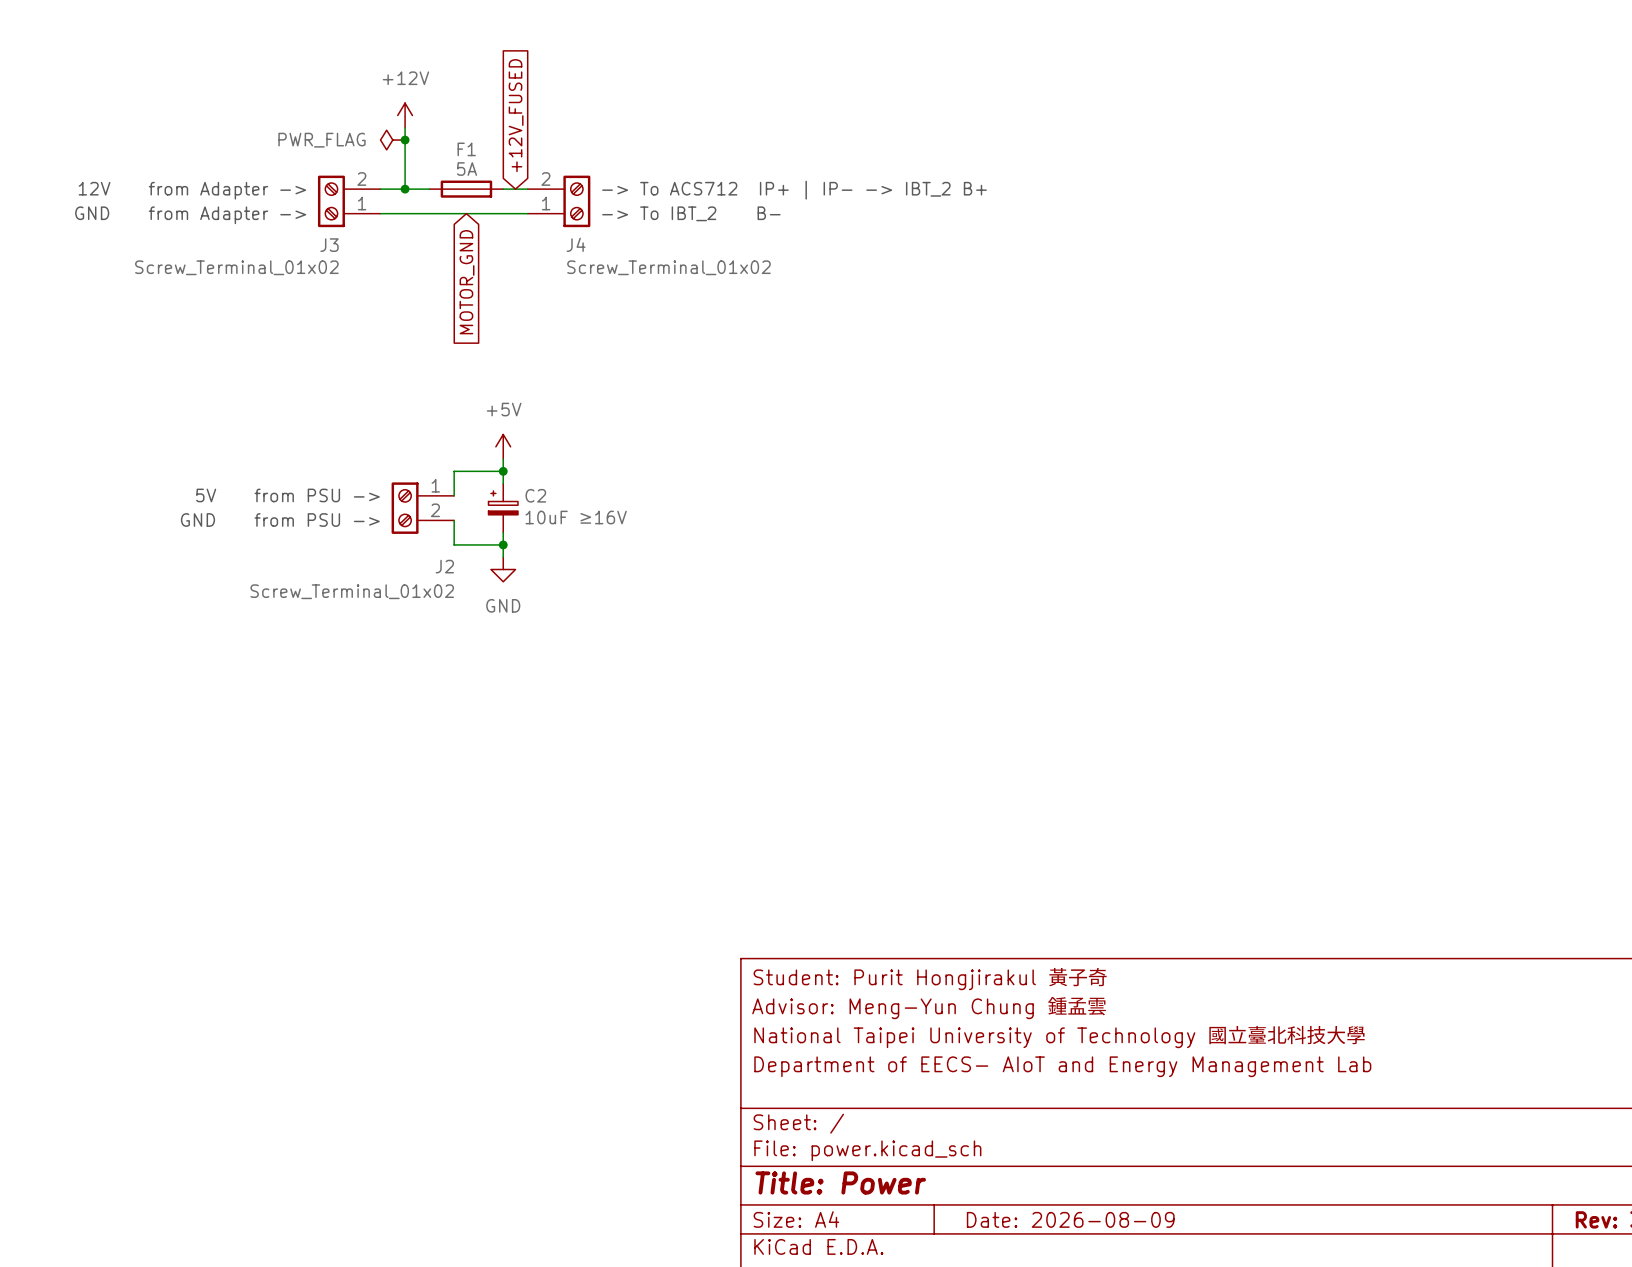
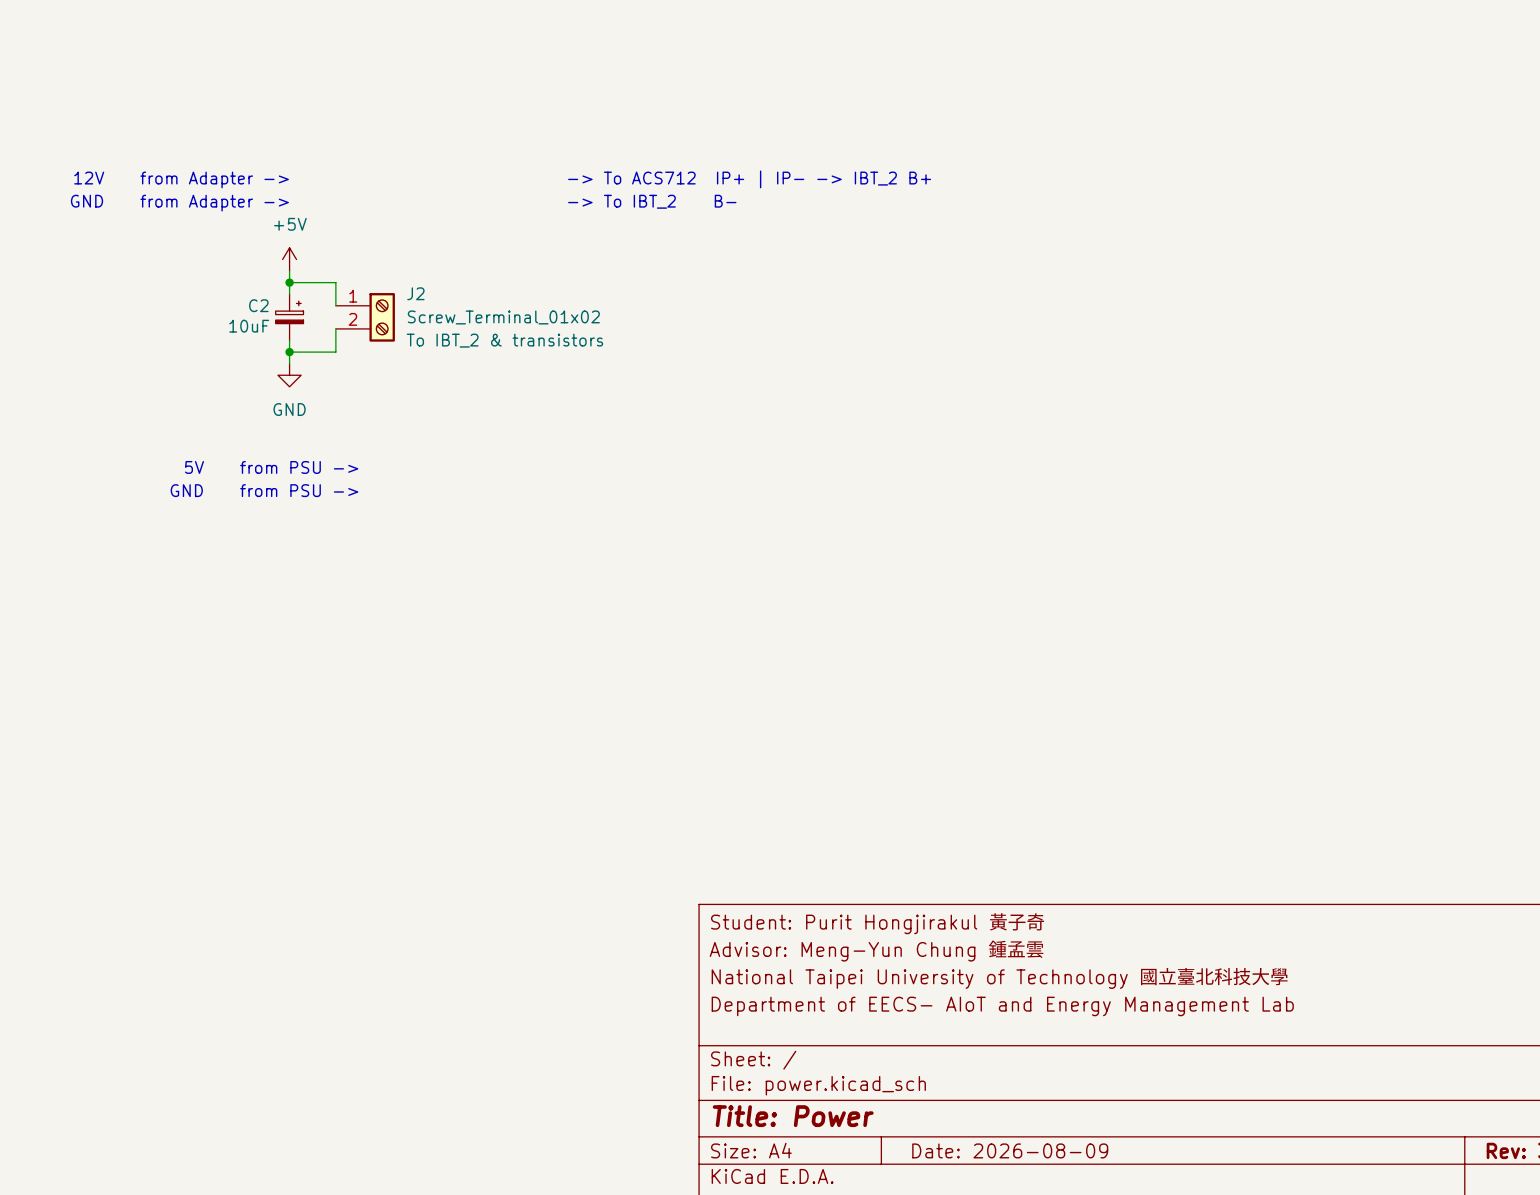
power symbol: +12V (405, 115) -> none
global label: +12V_FUSED (516, 115) -> none
wire: (405, 127) (405, 189) -> none
power symbol: PWR_FLAG (392, 140) -> none
junction: (405, 140) -> none
wire: (380, 189) (429, 189) -> none
junction: (405, 189) -> none
F1: 5A (466, 189) -> none
wire: (503, 189) (527, 189) -> none
J3: Screw_Terminal_01x02 (349, 201) -> none
J4: Screw_Terminal_01x02 (559, 201) -> none
wire: (380, 213) (527, 213) -> none
power symbol: none -> +5V (289, 259)
global label: MOTOR_GND (467, 282) -> none
wire: none -> (289, 271) (289, 294)
wire: none -> (289, 282) (335, 282) (335, 305)
junction: none -> (289, 282)
wire: none -> (335, 328) (335, 352) (289, 352)
J2 text: none -> To IBT_2 & transistors (504, 340)
junction: none -> (289, 352)
power symbol: none -> GND (289, 375)
power symbol: +5V (503, 446) -> none
wire: (503, 459) (503, 483) -> (289, 340) (289, 363)
wire: (503, 471) (454, 471) (454, 495) -> none
junction: (503, 471) -> none
C2 flip: as is (503, 502) -> left-right (289, 312)
J2 flip: as is (405, 508) -> left-right (382, 317)
J2 position: (422, 508) -> (365, 317)
C2 position: (503, 508) -> (289, 317)
C2 value: 10uF ≥16V (576, 517) -> 10uF (249, 326)
wire: (454, 520) (454, 544) (503, 544) -> none
wire: (503, 532) (503, 557) -> none
junction: (503, 544) -> none
J2 name position: J2 (444, 566) -> J2 (415, 293)
power symbol: GND (503, 569) -> none
J2 value position: Screw_Terminal_01x02 (352, 591) -> Screw_Terminal_01x02 (503, 317)

